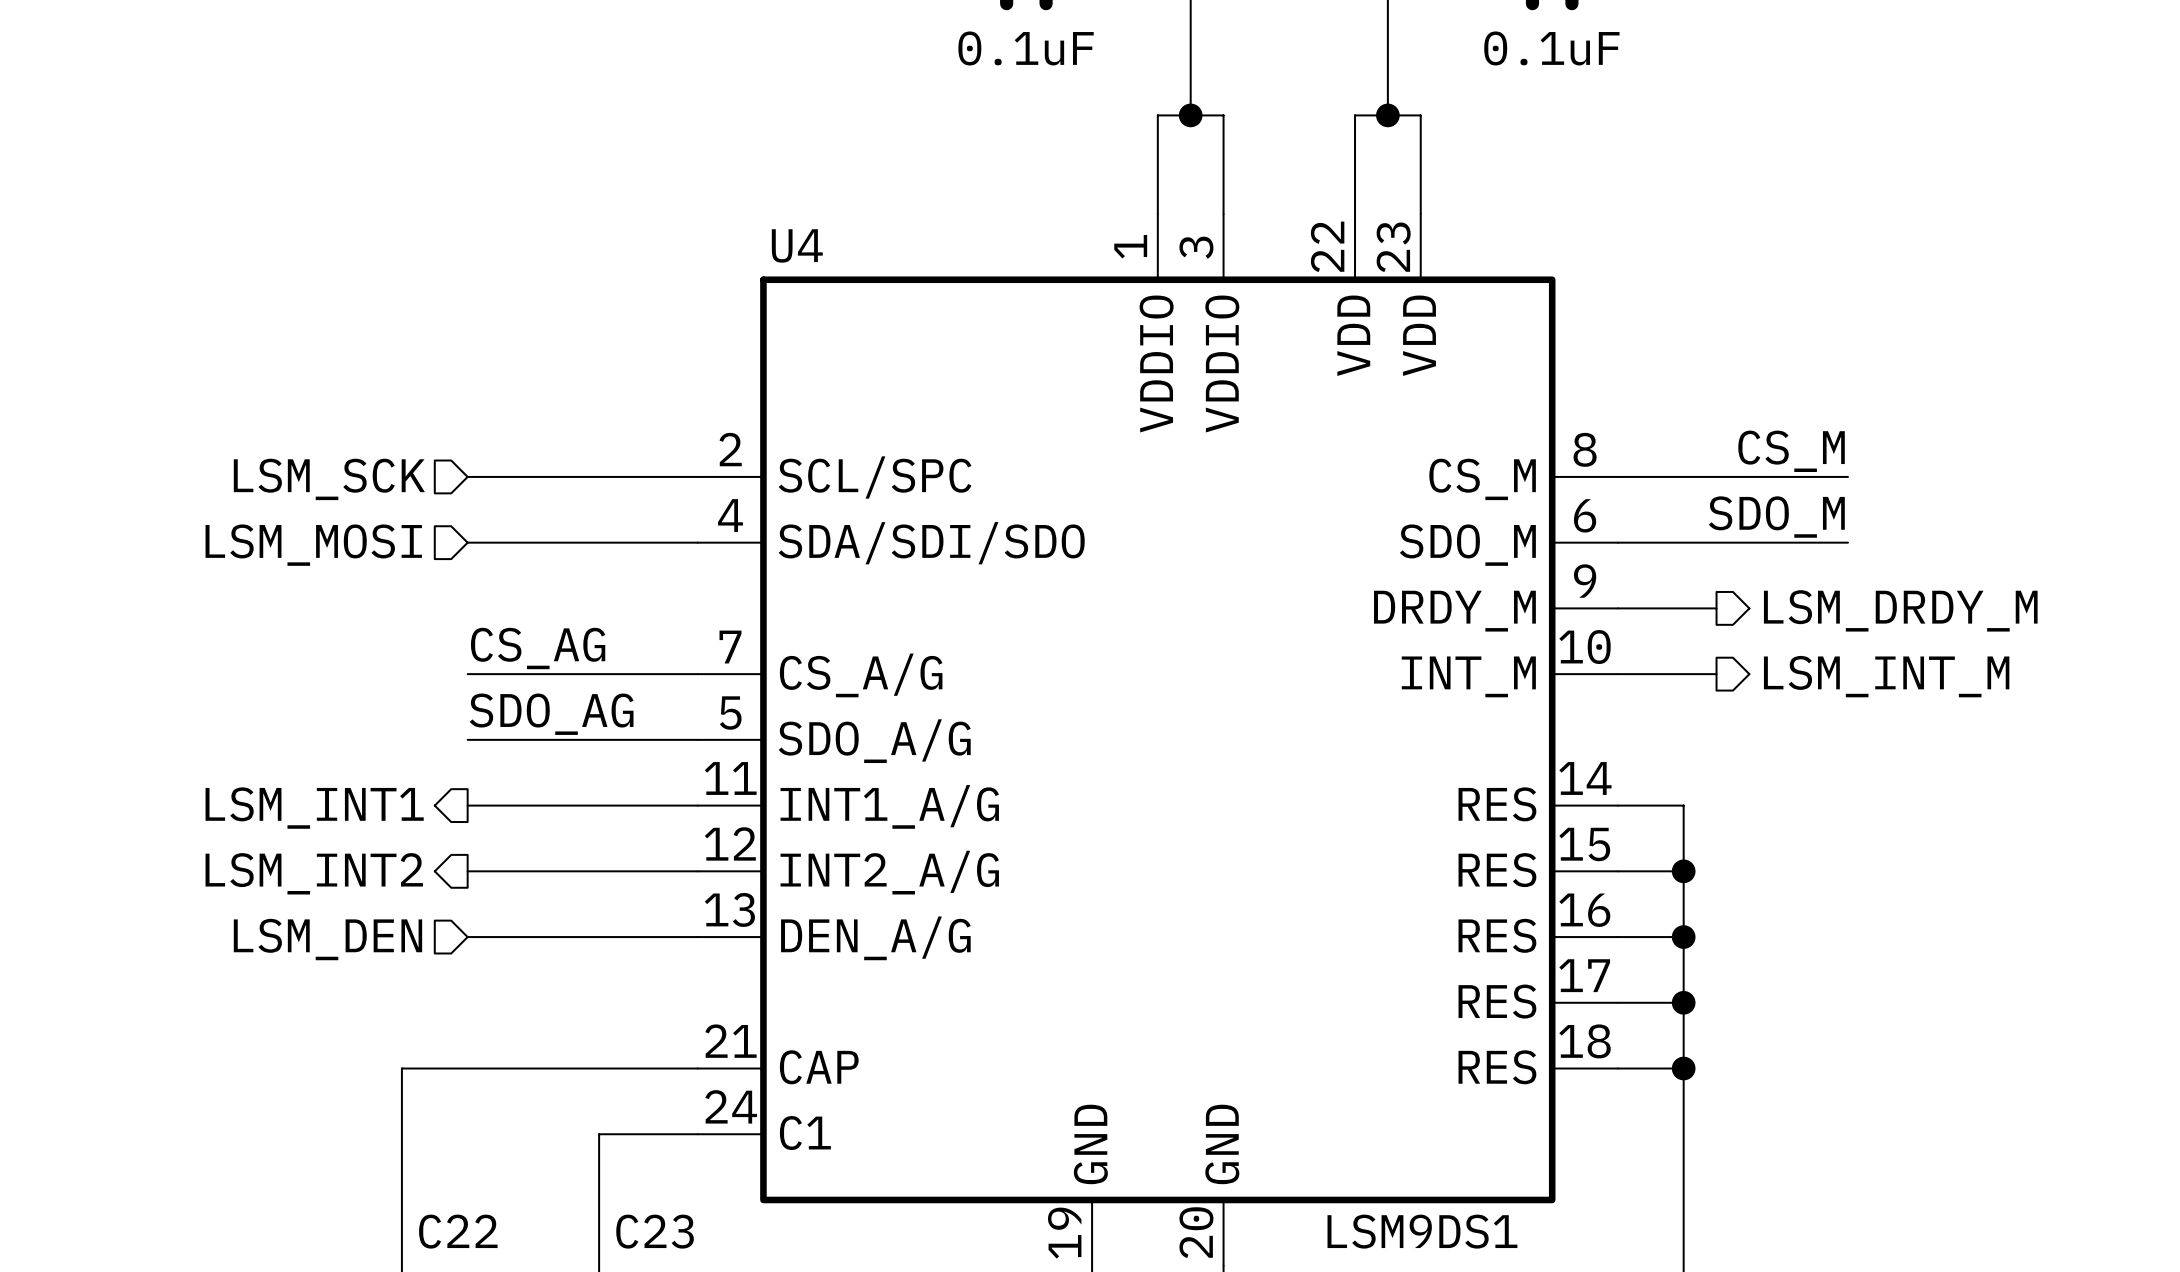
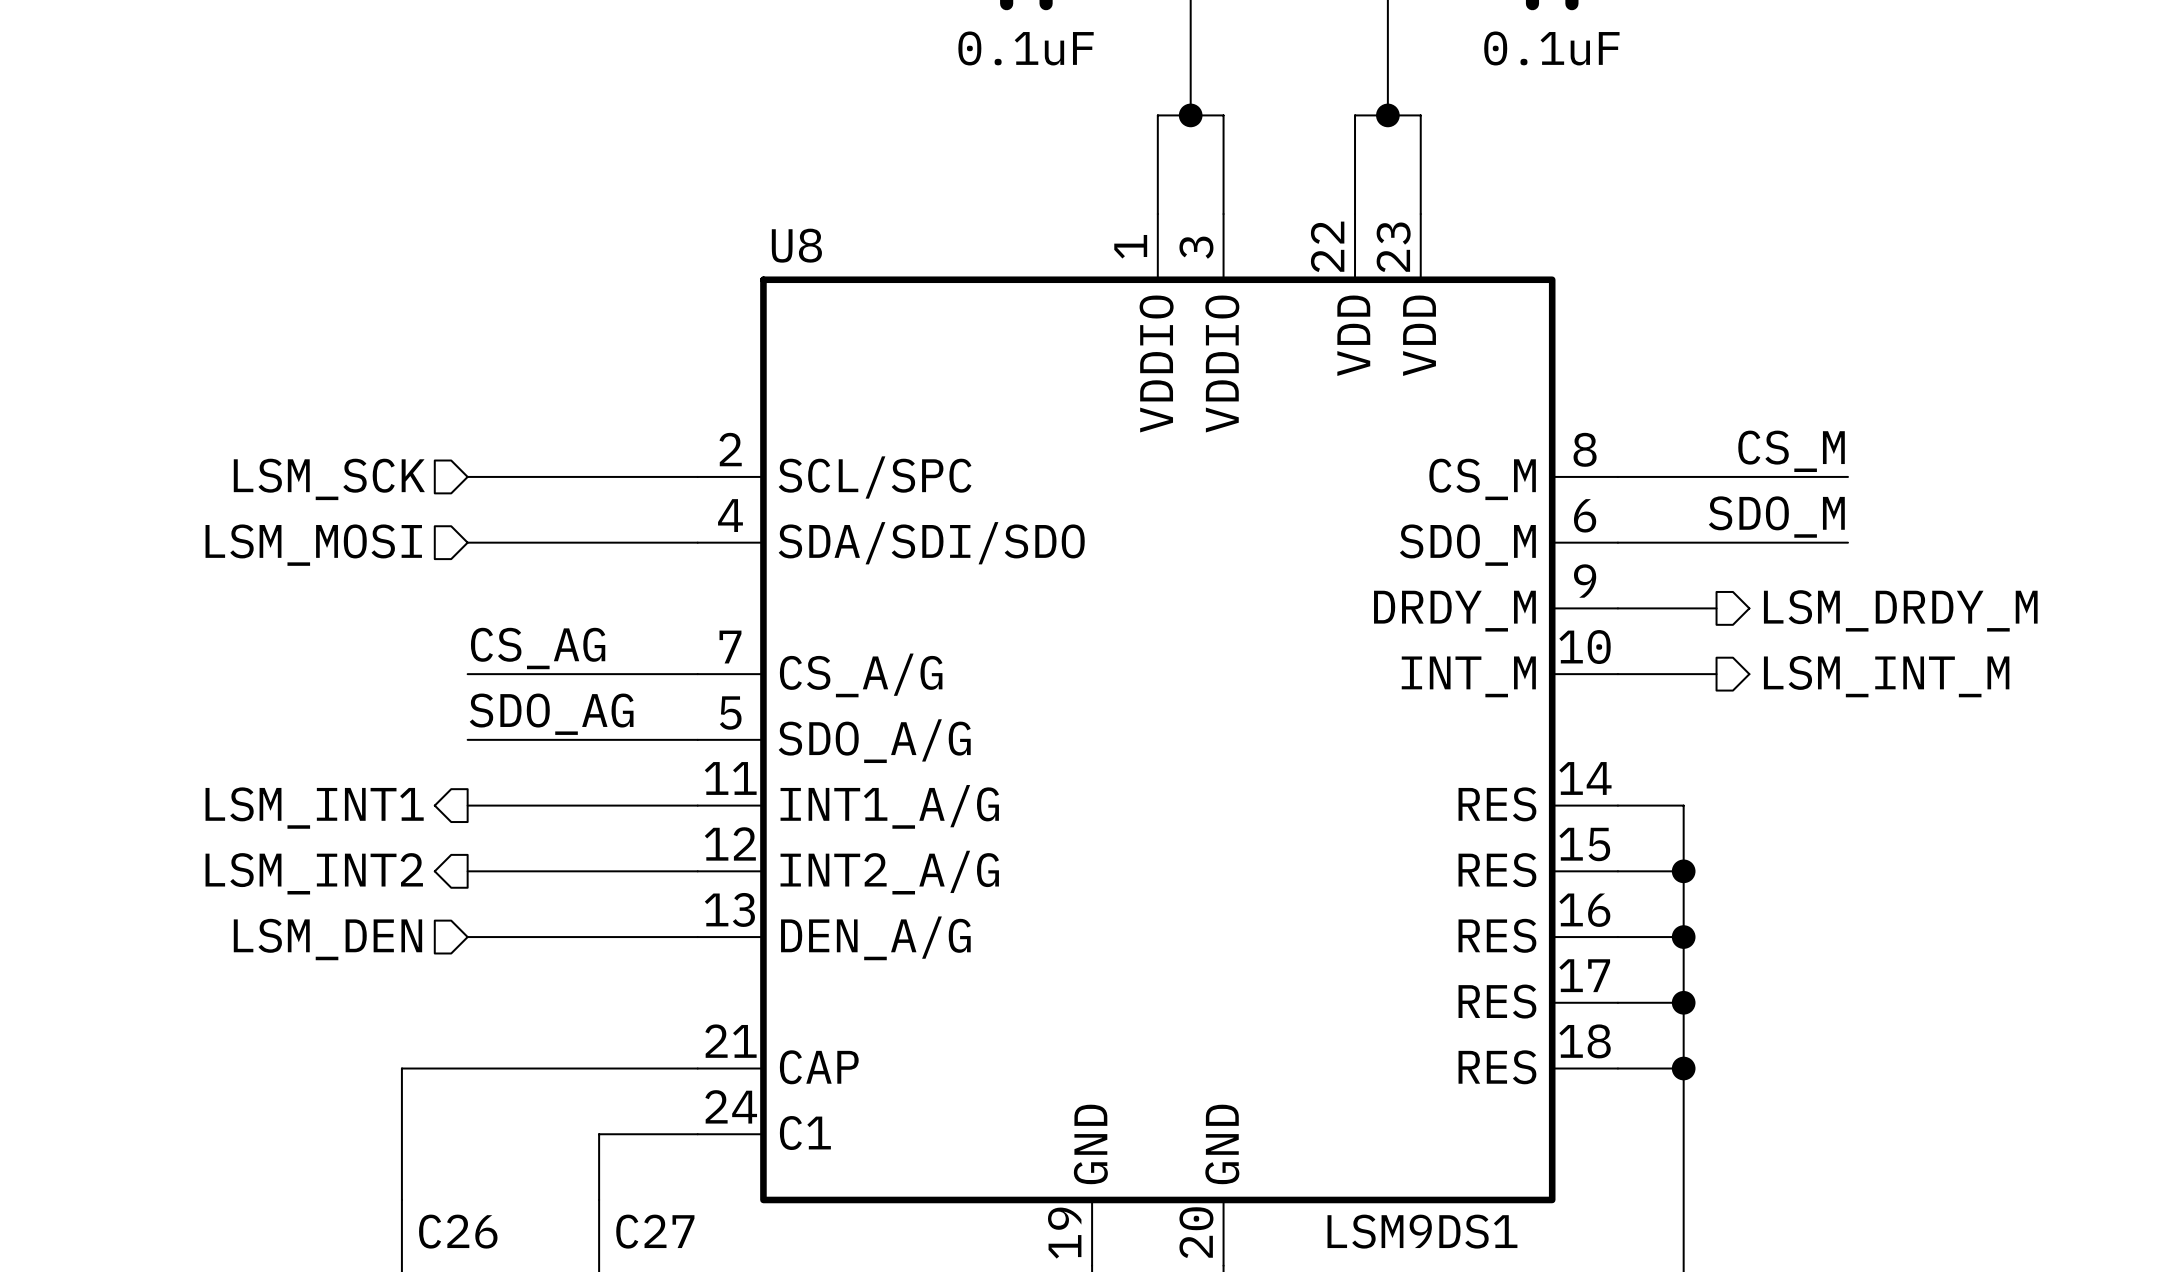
U4 name: U4 (797, 245) -> U8 (796, 245)
C22 name: C22 (458, 1231) -> C26 (458, 1231)
C23 name: C23 (655, 1231) -> C27 (655, 1231)

